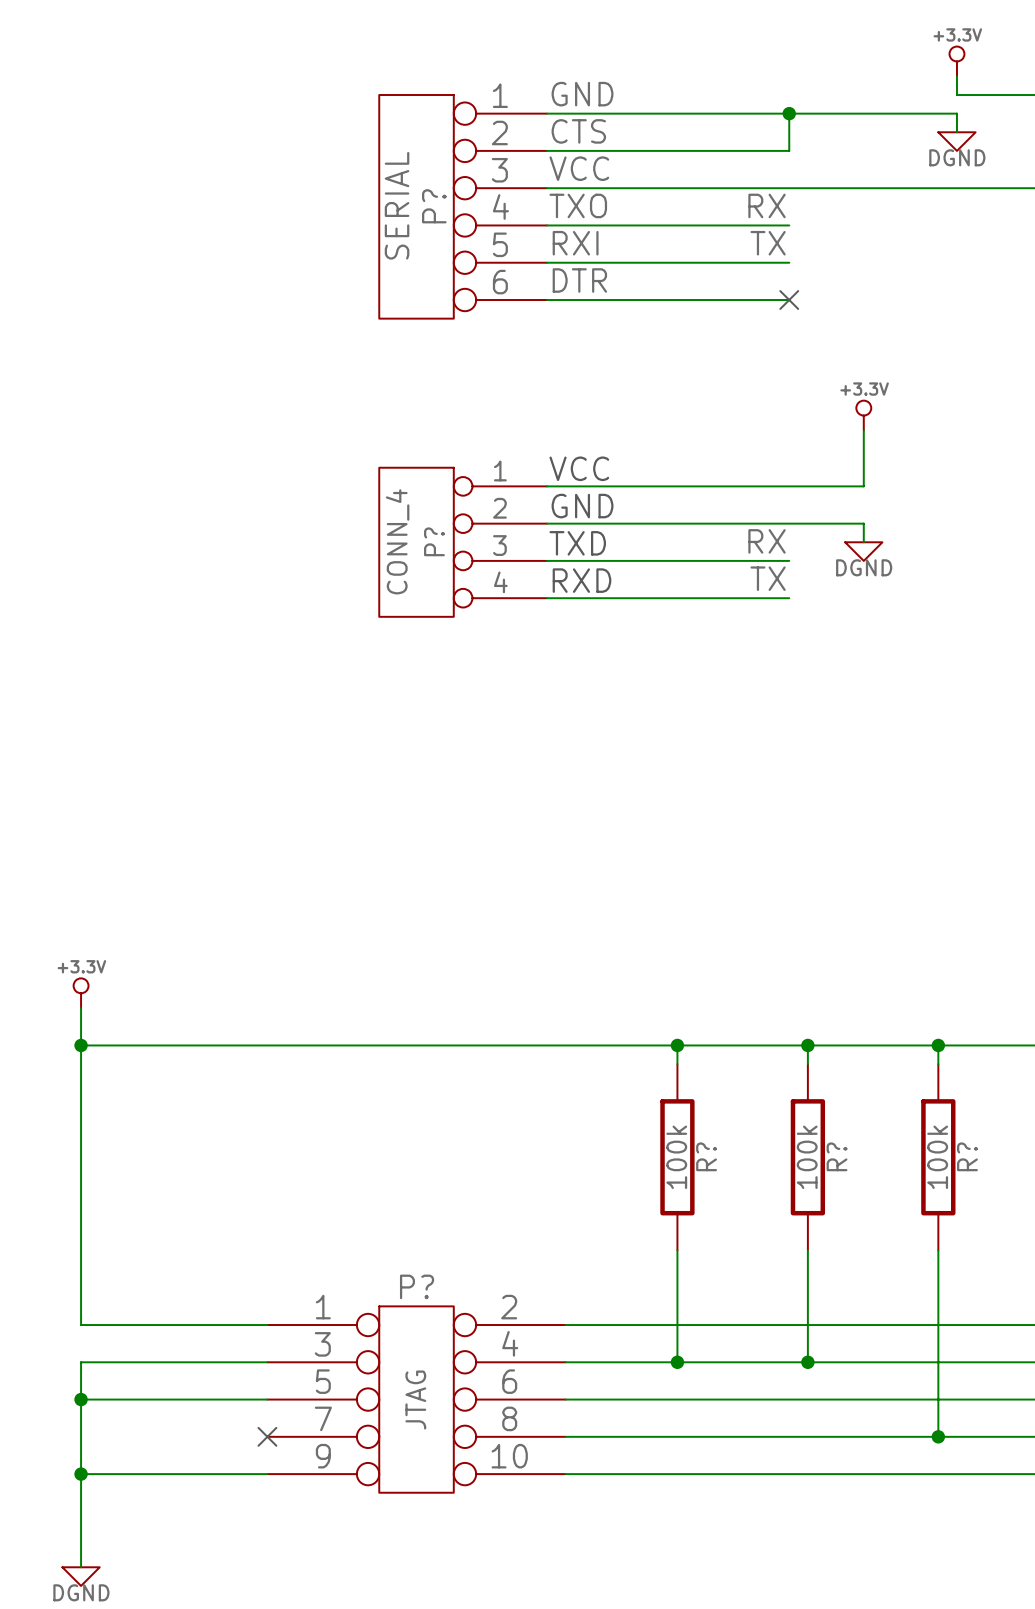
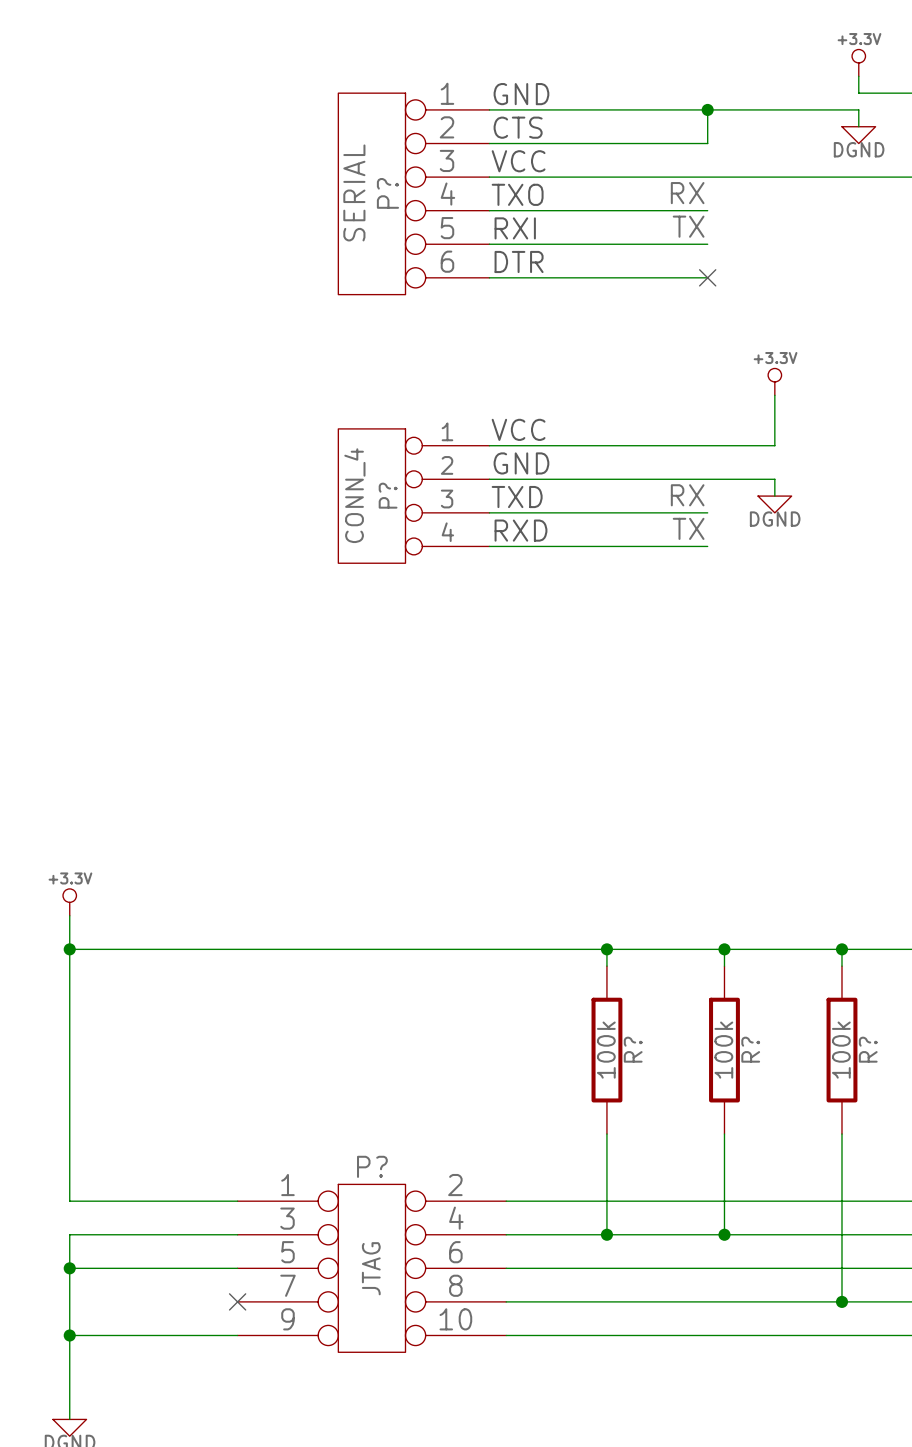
label: GND (582, 94) -> none
text: none -> GND (521, 94)
label: CTS (578, 131) -> none
text: none -> CTS (518, 127)
label: VCC (579, 168) -> none
text: none -> VCC (518, 161)
label: TXO (578, 205) -> none
text: none -> TXO (517, 194)
label: RXI (575, 243) -> none
text: none -> RXI (515, 228)
label: DTR (579, 280) -> none
text: none -> DTR (519, 261)

